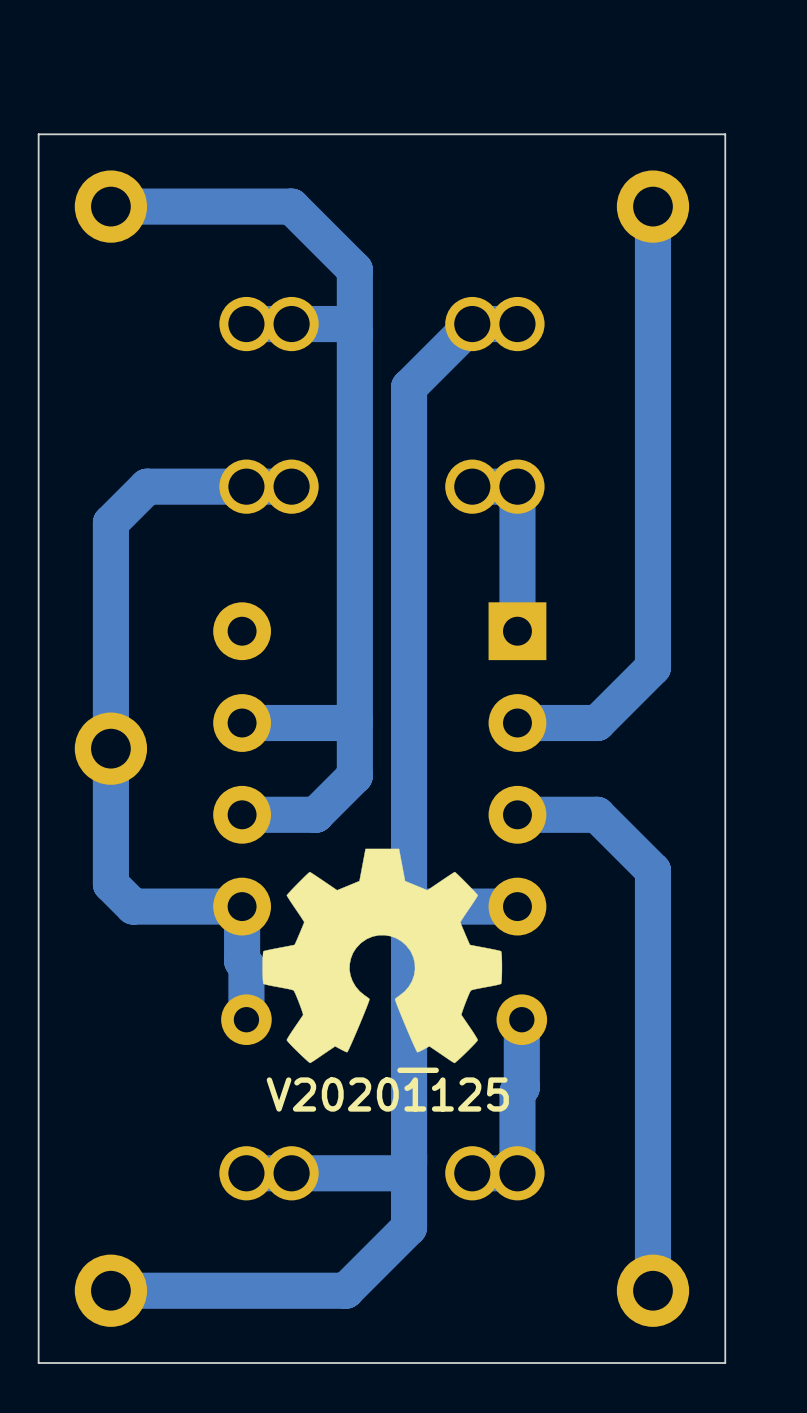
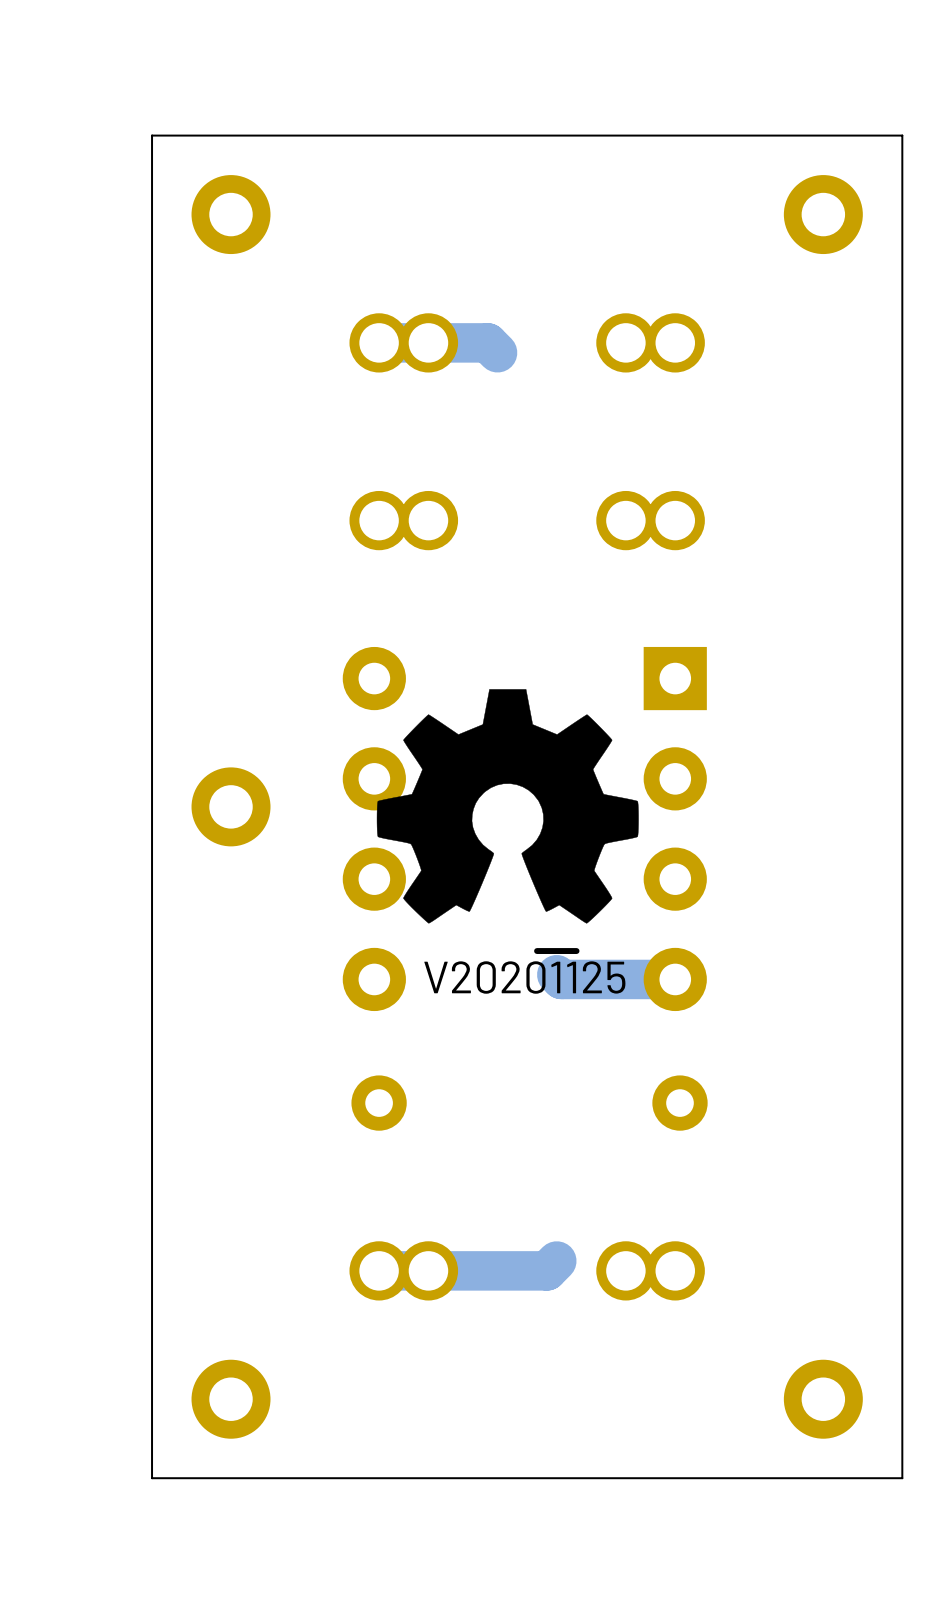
bottom track: (110, 206) (291, 206) (354, 269) (354, 775) (315, 814) (242, 814) -> none
bottom track: (652, 206) (652, 667) (597, 723) (517, 723) -> none
bottom track: (517, 324) (472, 324) (409, 387) (409, 1227) (345, 1290) (110, 1290) -> none
bottom track: (291, 486) (147, 486) (110, 522) (110, 884) (133, 906) (242, 906) (242, 961) (246, 965) (246, 1019) -> none
bottom track: (472, 486) (517, 486) (517, 631) -> none
bottom track: (354, 721) (242, 723) -> none
bottom track: (517, 814) (597, 814) (652, 870) (652, 1290) -> none
drawing position: (382, 955) -> (507, 806)
bottom track: (521, 1019) (521, 1087) (517, 1091) (517, 1173) (472, 1173) -> none
drawing position: (418, 1070) -> (556, 951)

